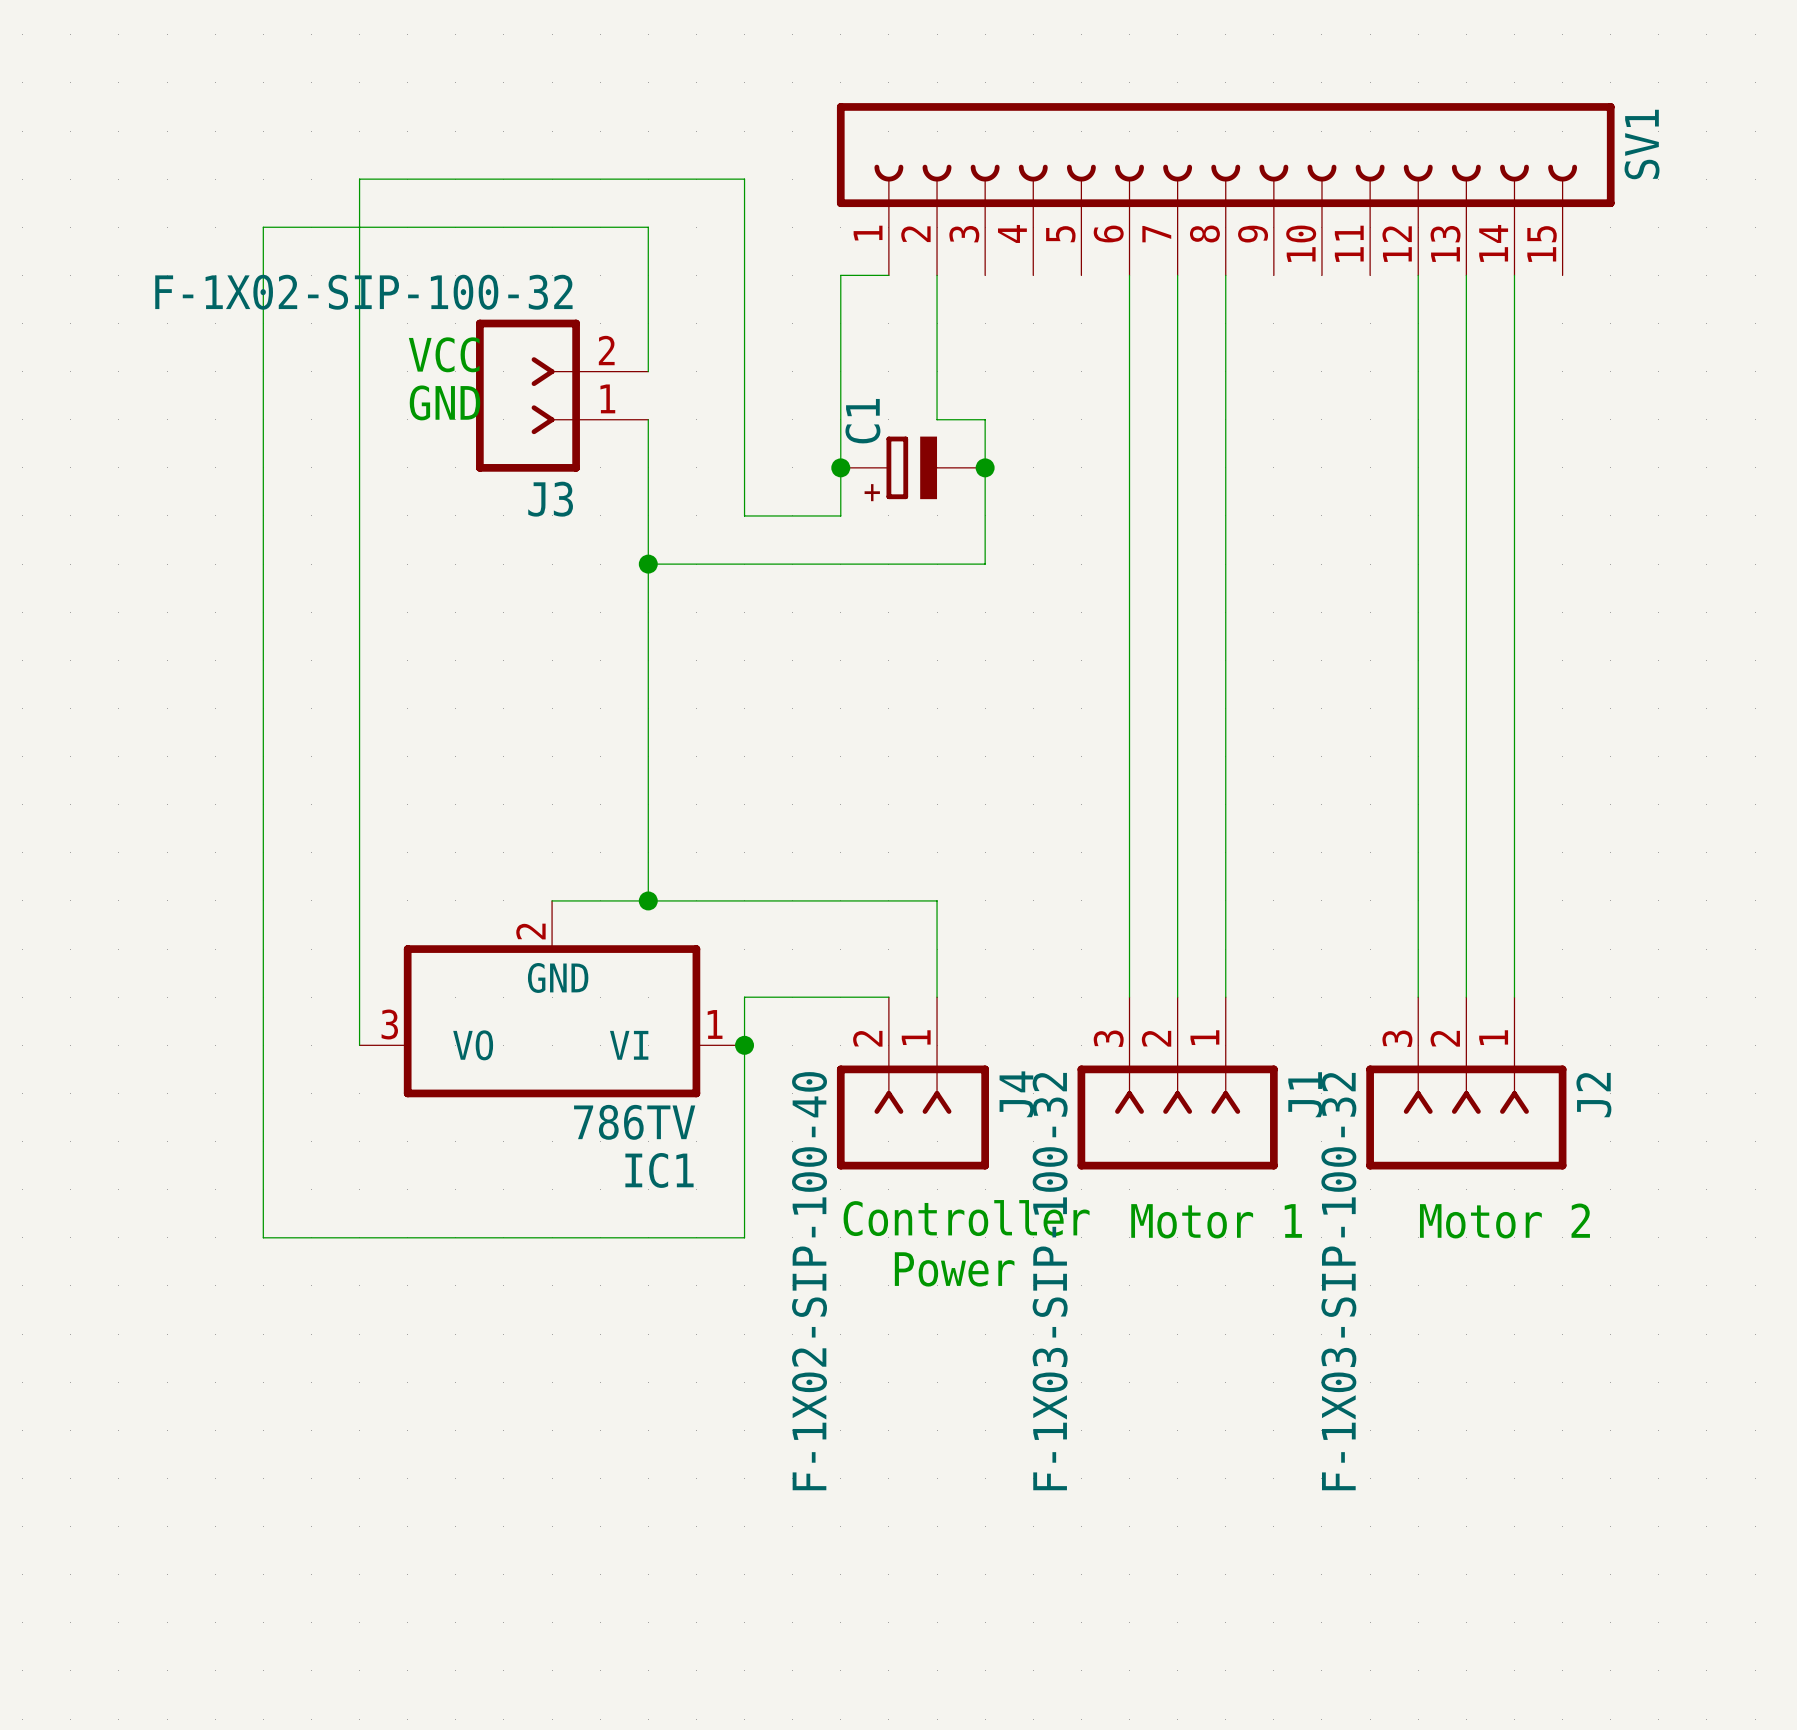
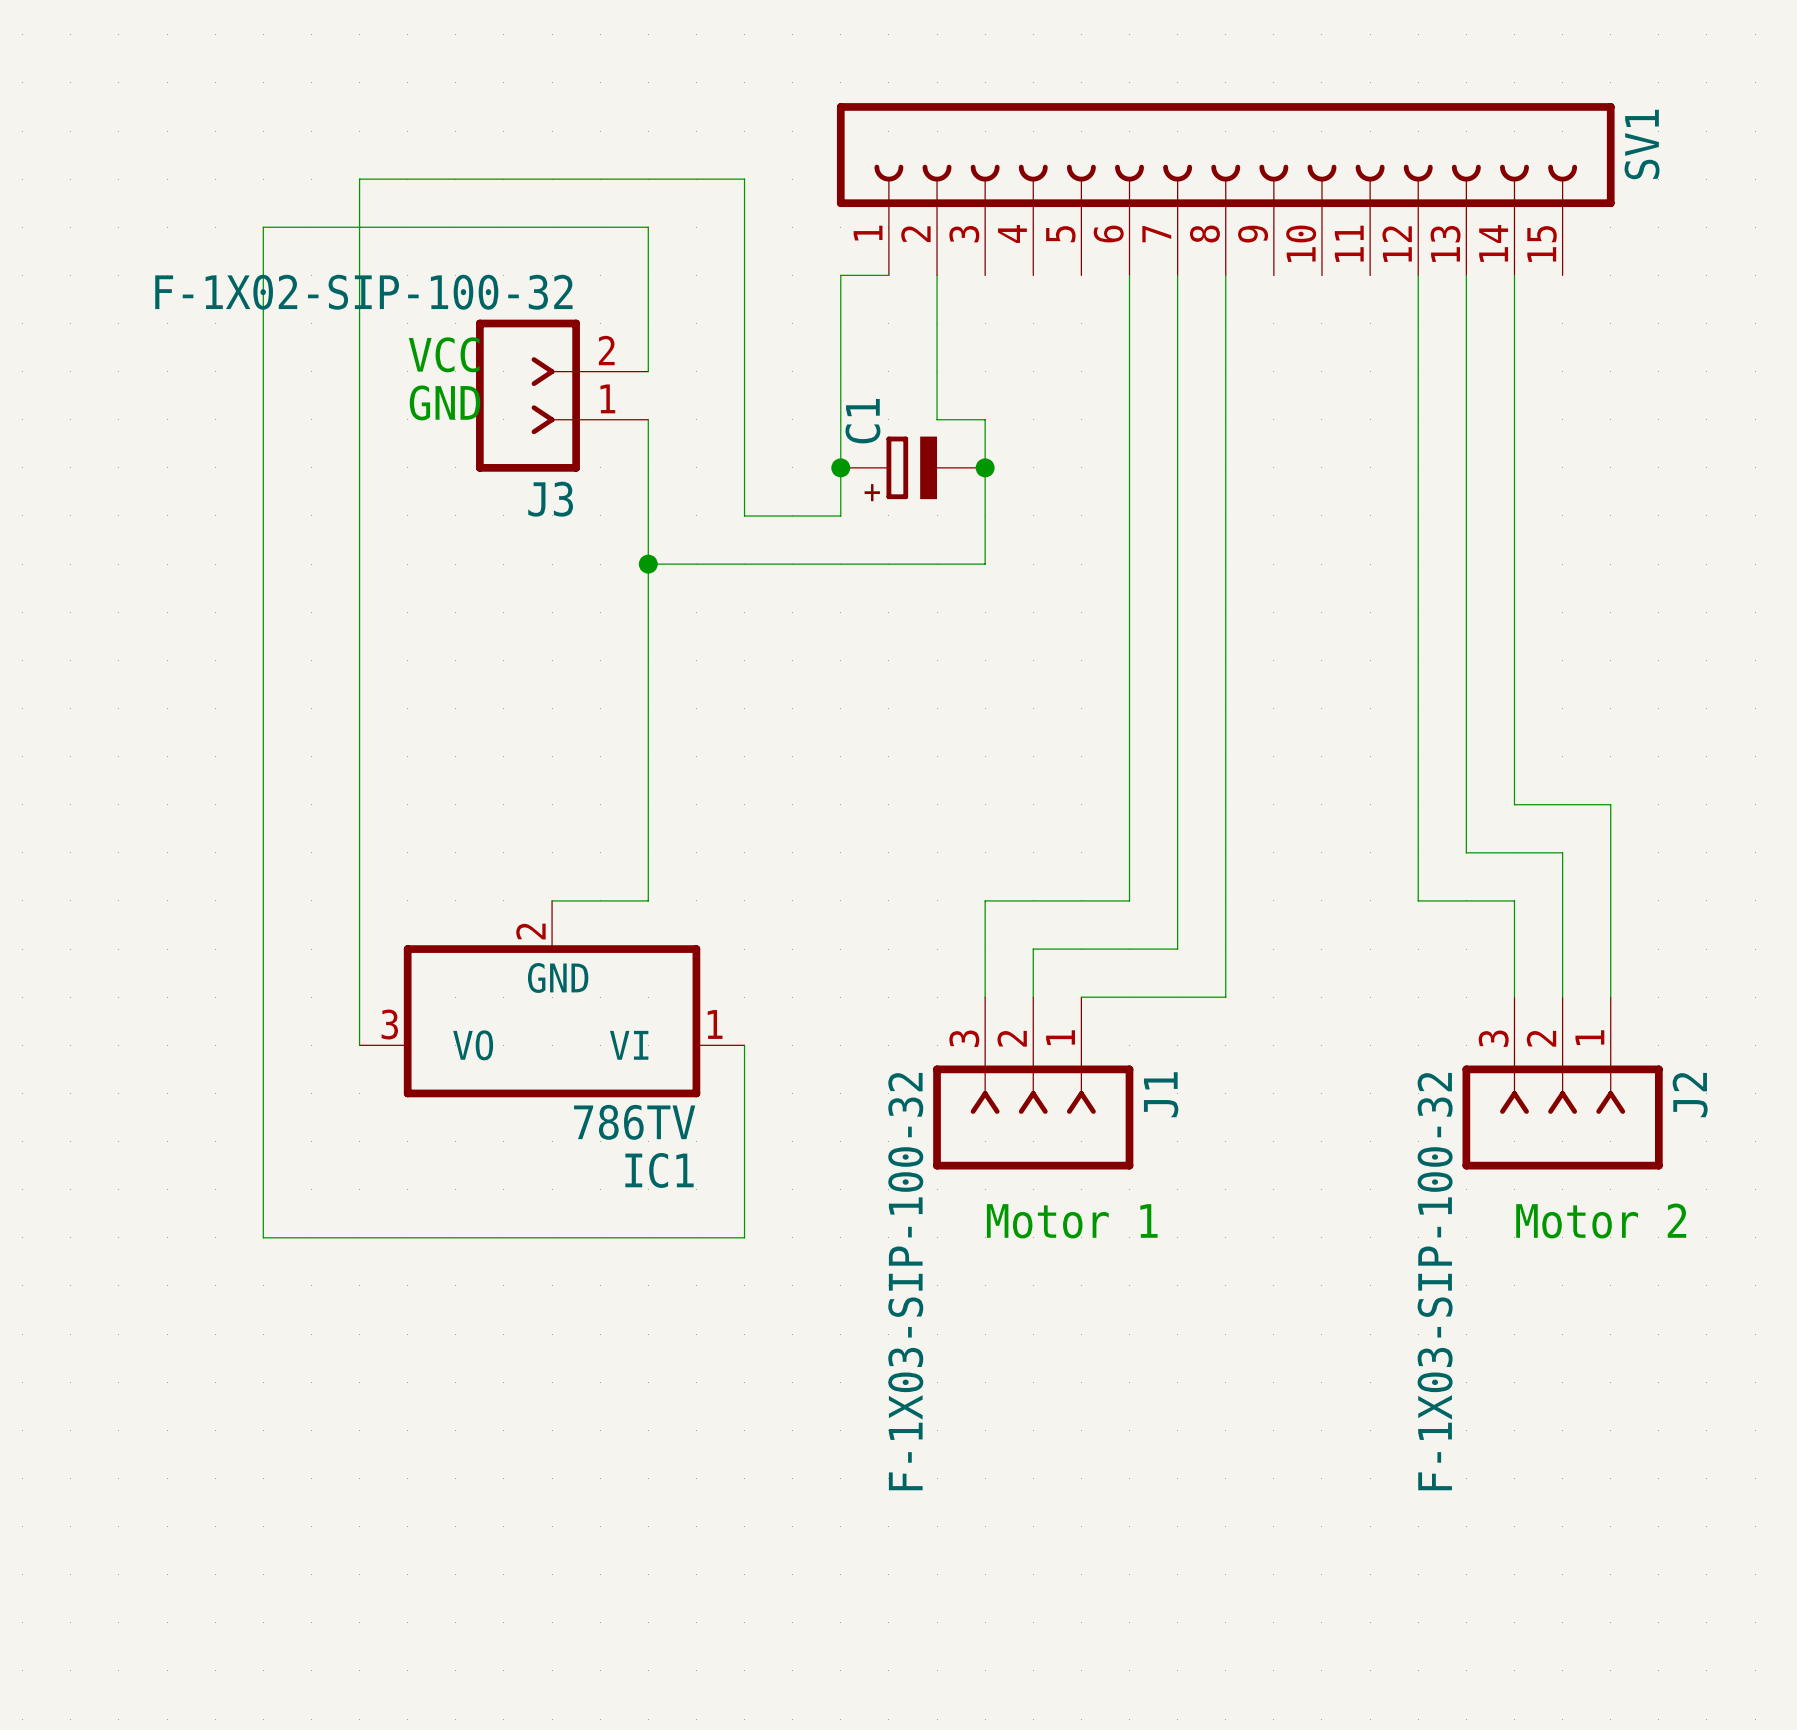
wire: (1514, 804) (1514, 900) -> (1514, 804) (1610, 804) (1610, 997)
wire: (1466, 852) (1466, 997) -> (1466, 852) (1562, 852) (1562, 997)
wire: (648, 900) (937, 900) (937, 997) -> none
junction: (648, 900) -> none
wire: (1129, 900) (1129, 997) -> (1129, 900) (985, 900) (985, 997)
wire: (1418, 900) (1418, 997) -> (1418, 900) (1514, 900)
wire: (1177, 949) (1177, 997) -> (1177, 949) (1033, 949) (1033, 997)
wire: (888, 997) (744, 997) (744, 1045) -> none
wire: none -> (1081, 997) (1225, 997)
junction: (744, 1045) -> none
J4: F-1X02-SIP-100-40 (912, 1083) -> none
J1 position: (1177, 1083) -> (1033, 1083)
J2 position: (1466, 1083) -> (1562, 1083)
text: Controller (966, 1218) -> none
text position: Motor 2 (1504, 1220) -> Motor 2 (1601, 1220)
text position: Motor 1 (1216, 1221) -> Motor 1 (1072, 1221)
text: Power (954, 1269) -> none

